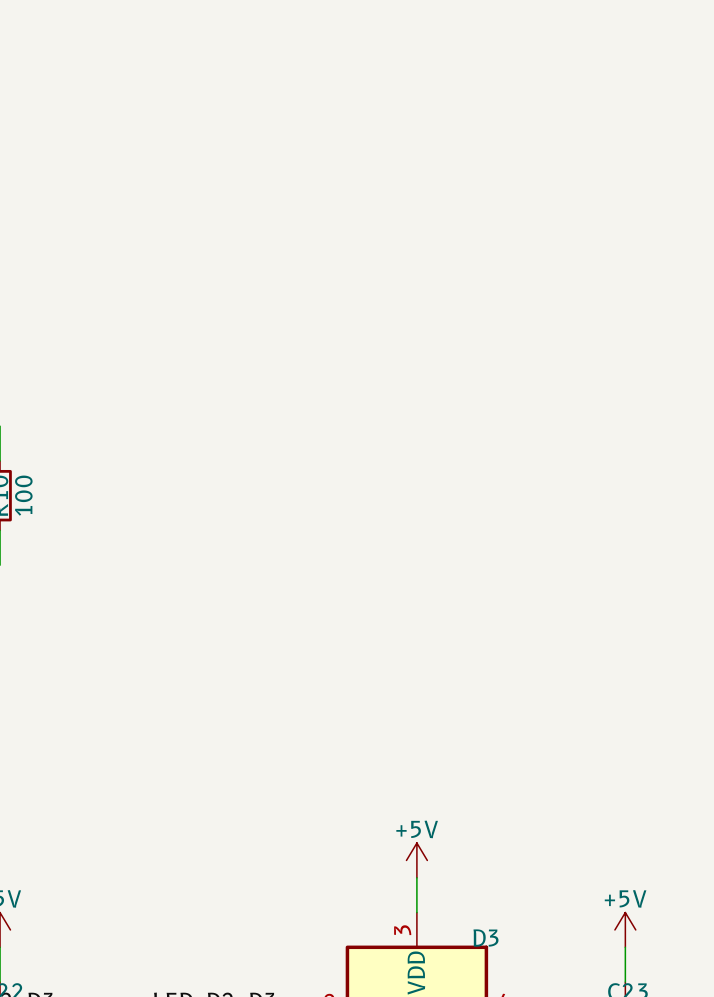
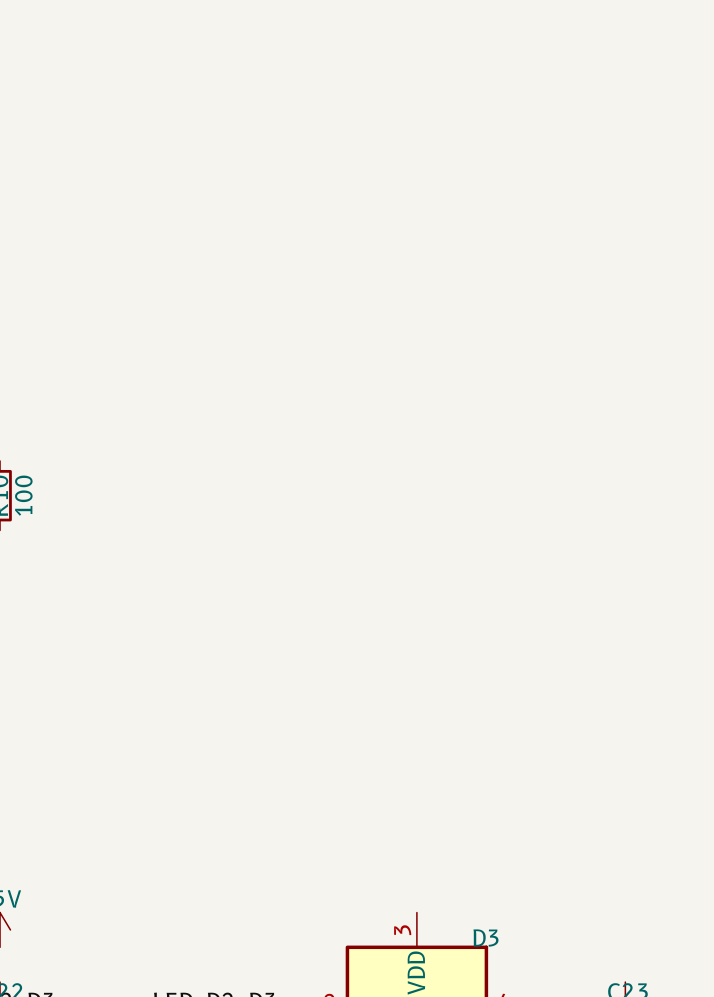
wire: (0, 426) (0, 460) -> none
wire: (0, 530) (0, 565) -> none
power symbol: +5V (416, 860) -> none
wire: (416, 877) (416, 912) -> none
power symbol: +5V (625, 929) -> none
wire: (0, 947) (0, 982) -> none
wire: (625, 947) (625, 982) -> none

